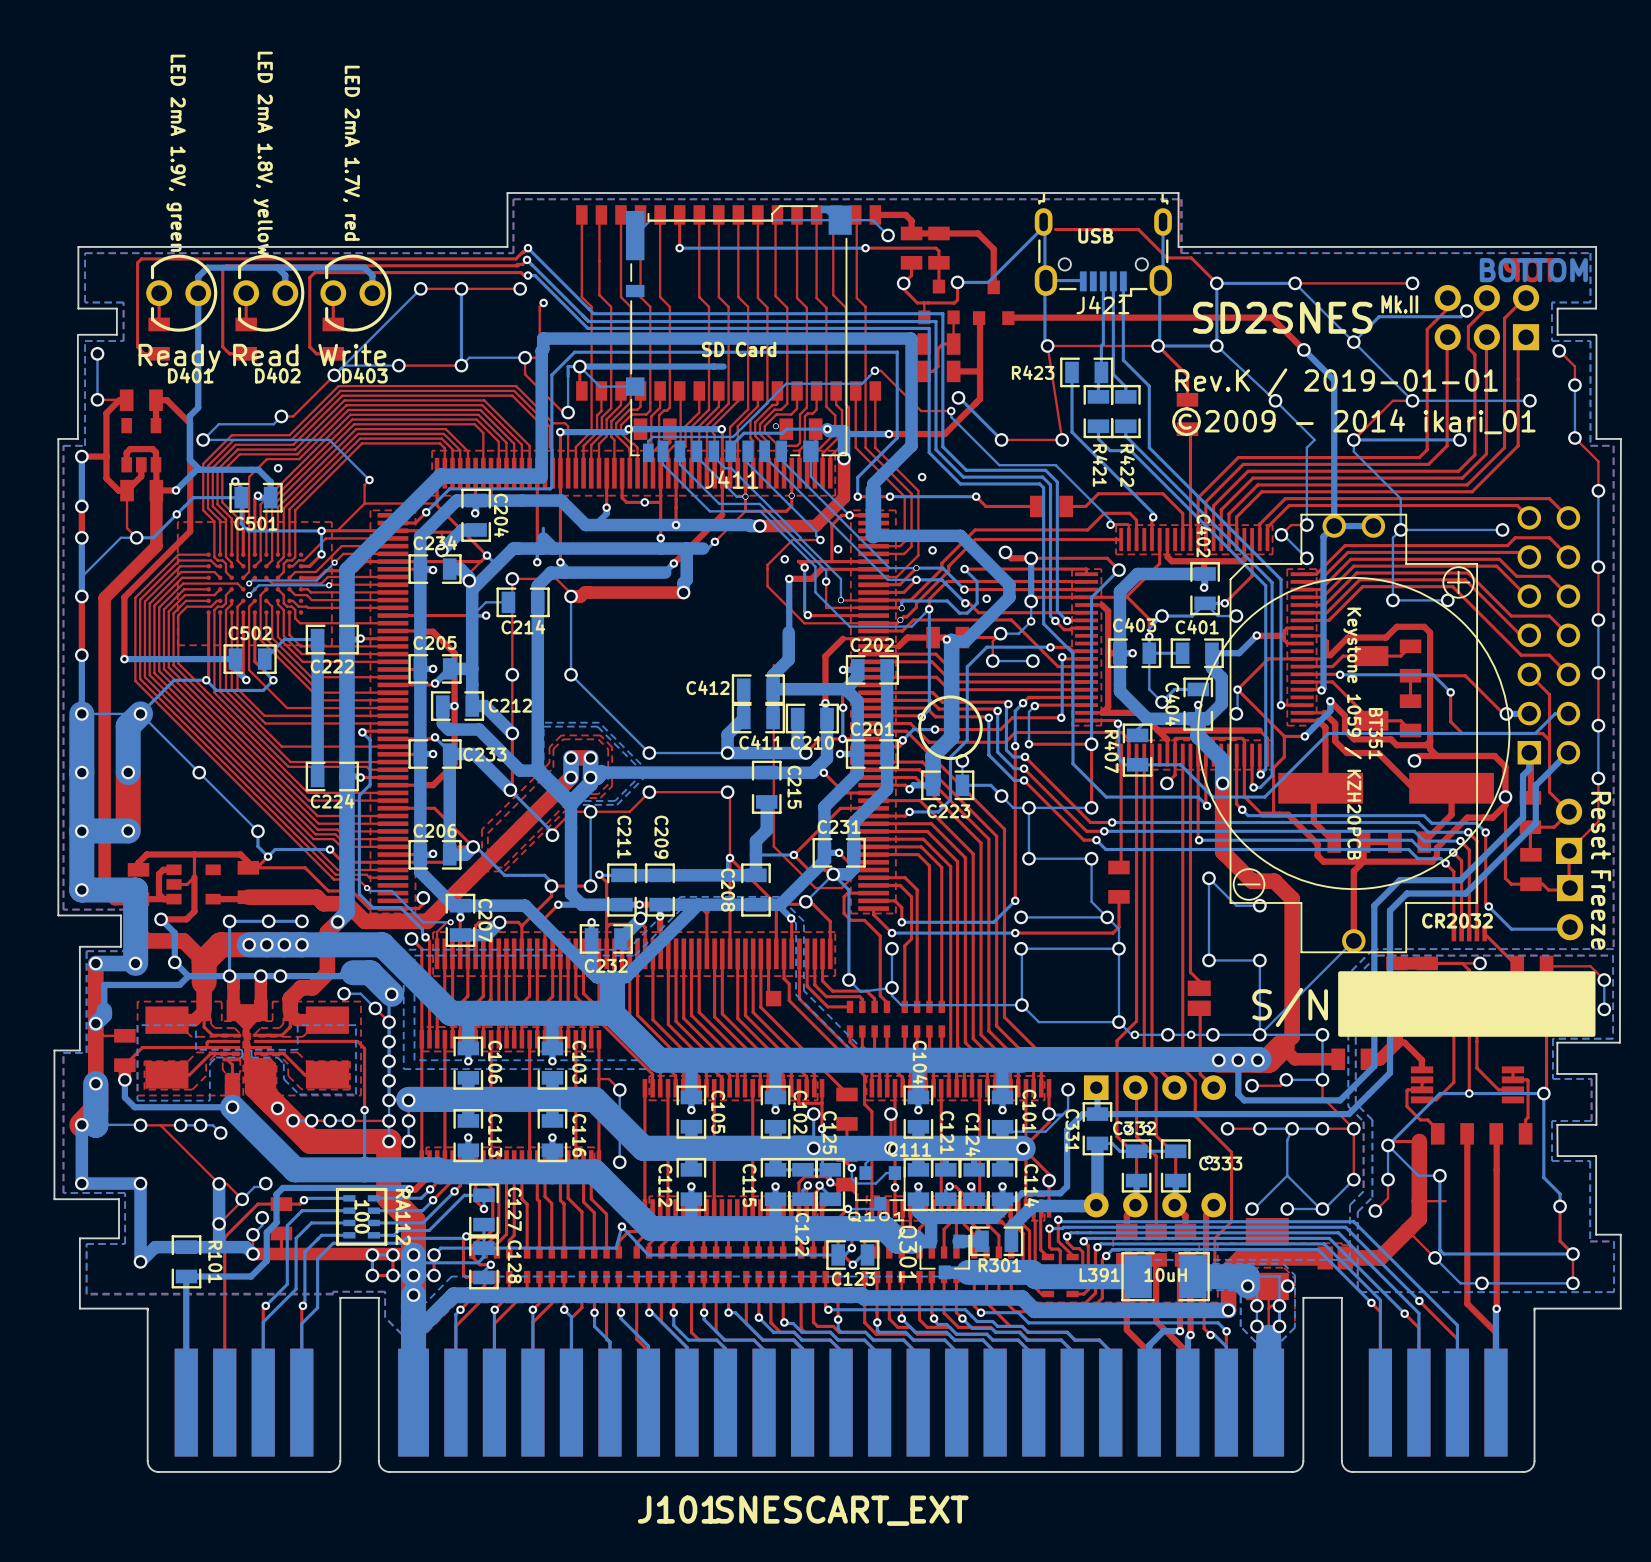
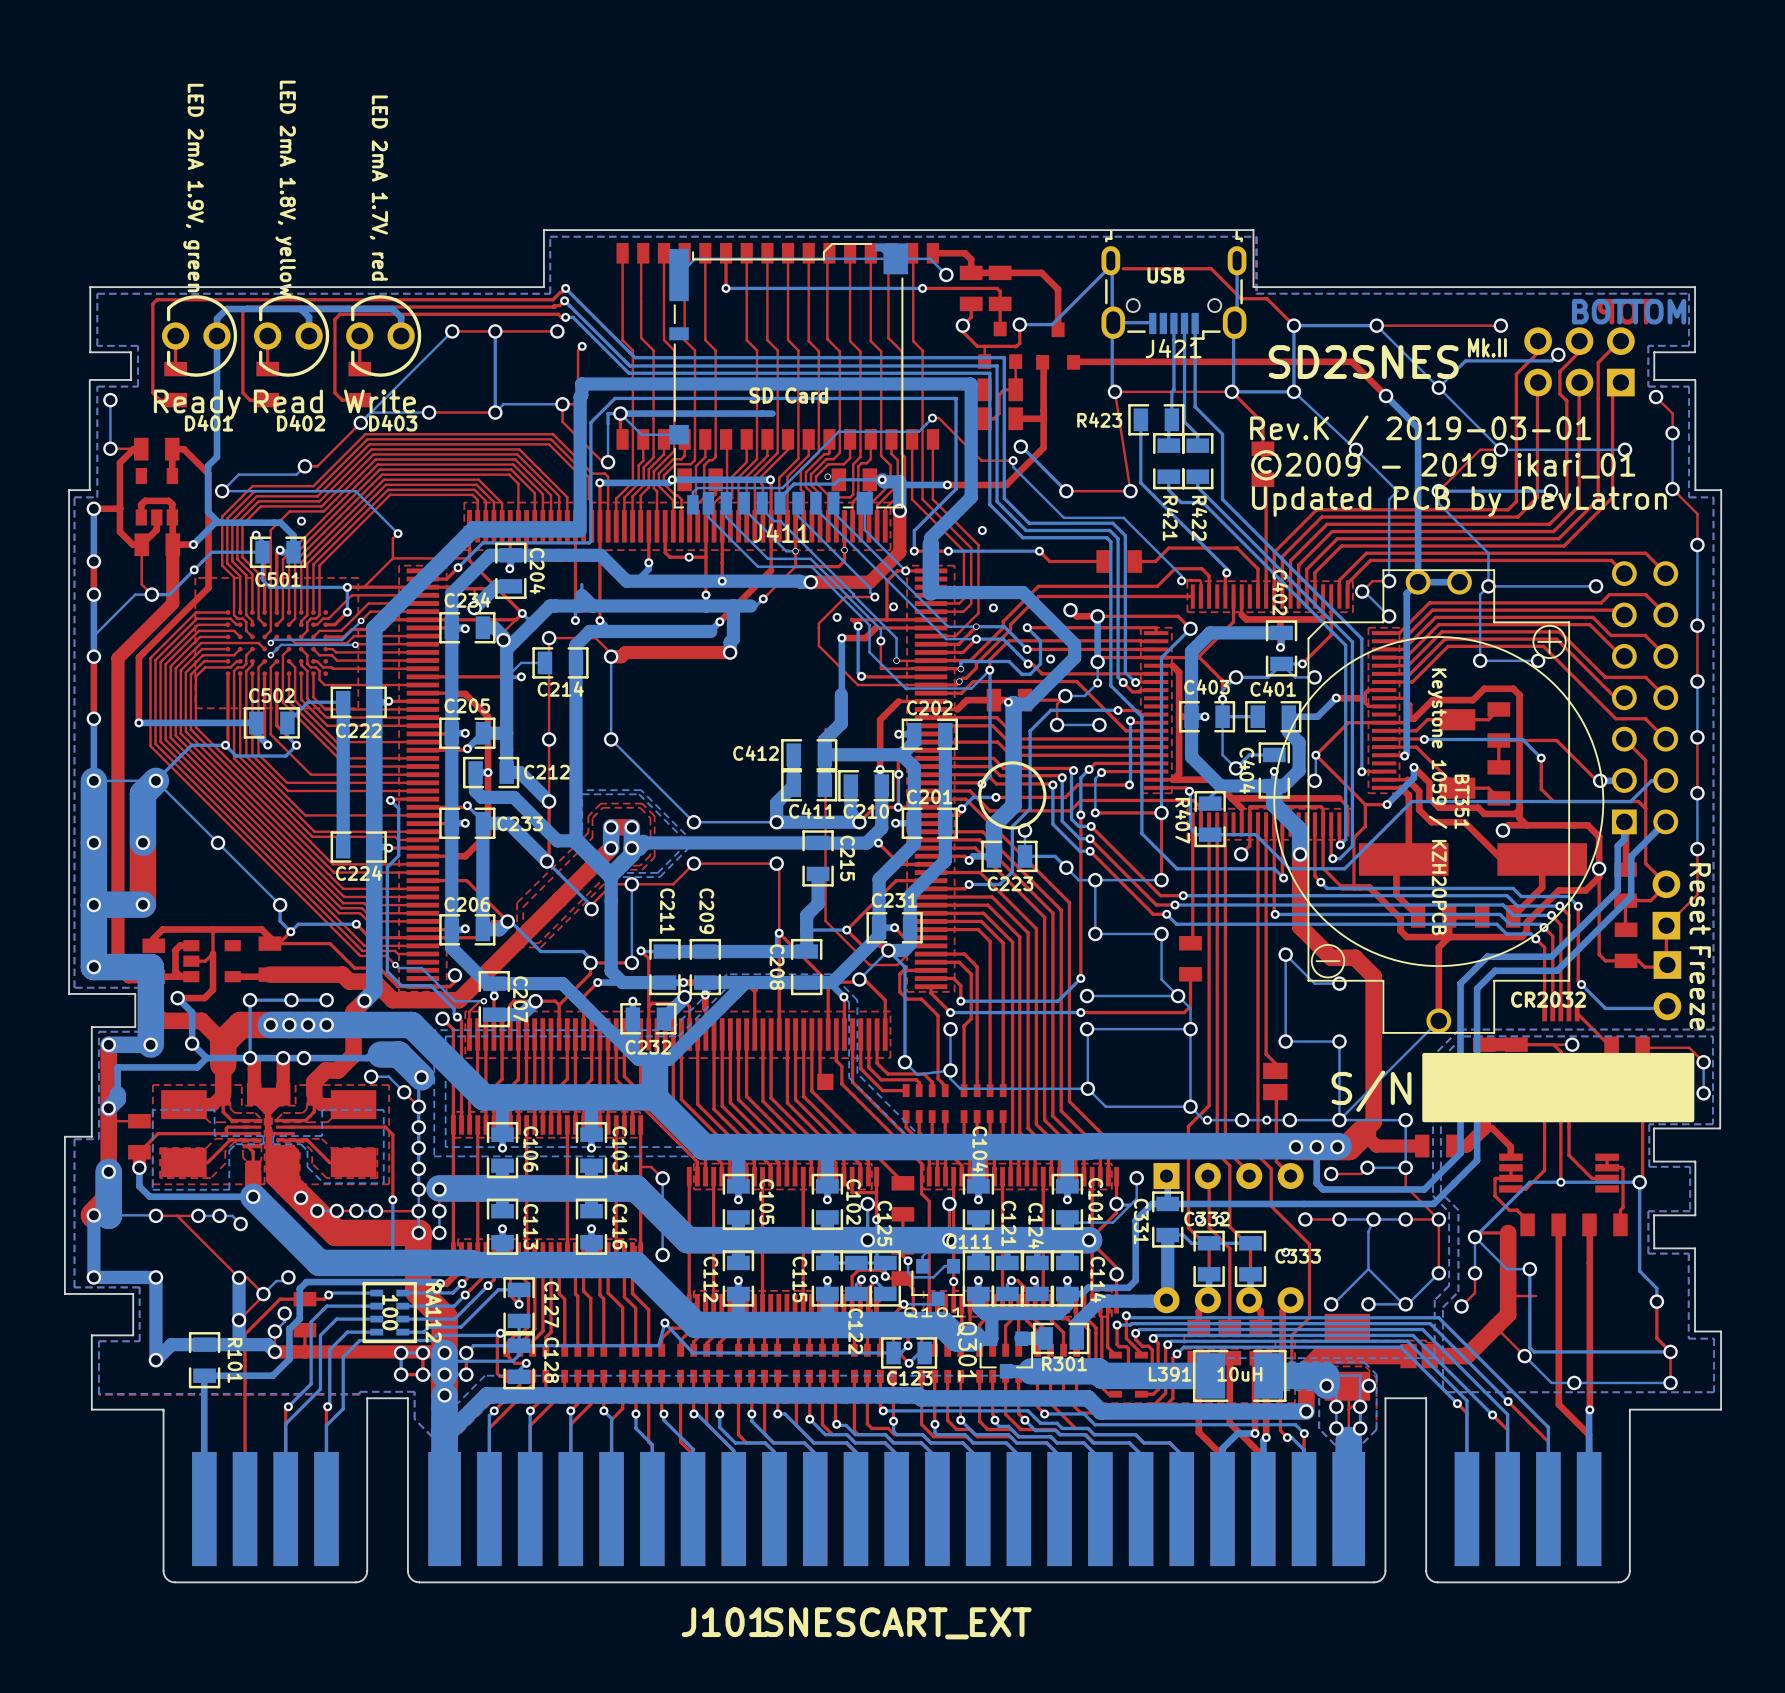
text: Rev.K / 2019-01-01 (1336, 382) -> Rev.K / 2019-03-01 (1420, 430)
text: ©2009 - 2014 ikari_01 (1353, 421) -> ©2009 - 2019 ikari_01 (1443, 465)
text: none -> Updated PCB by DevLatron (1459, 501)

